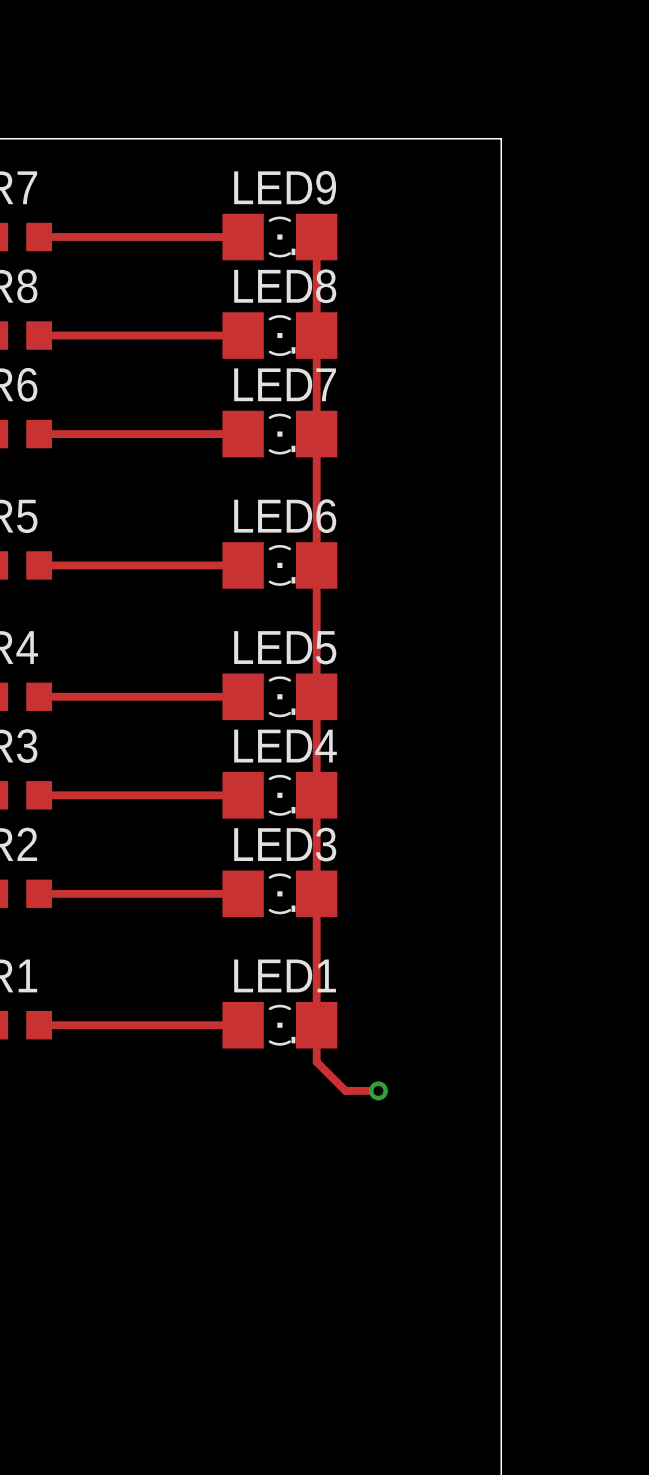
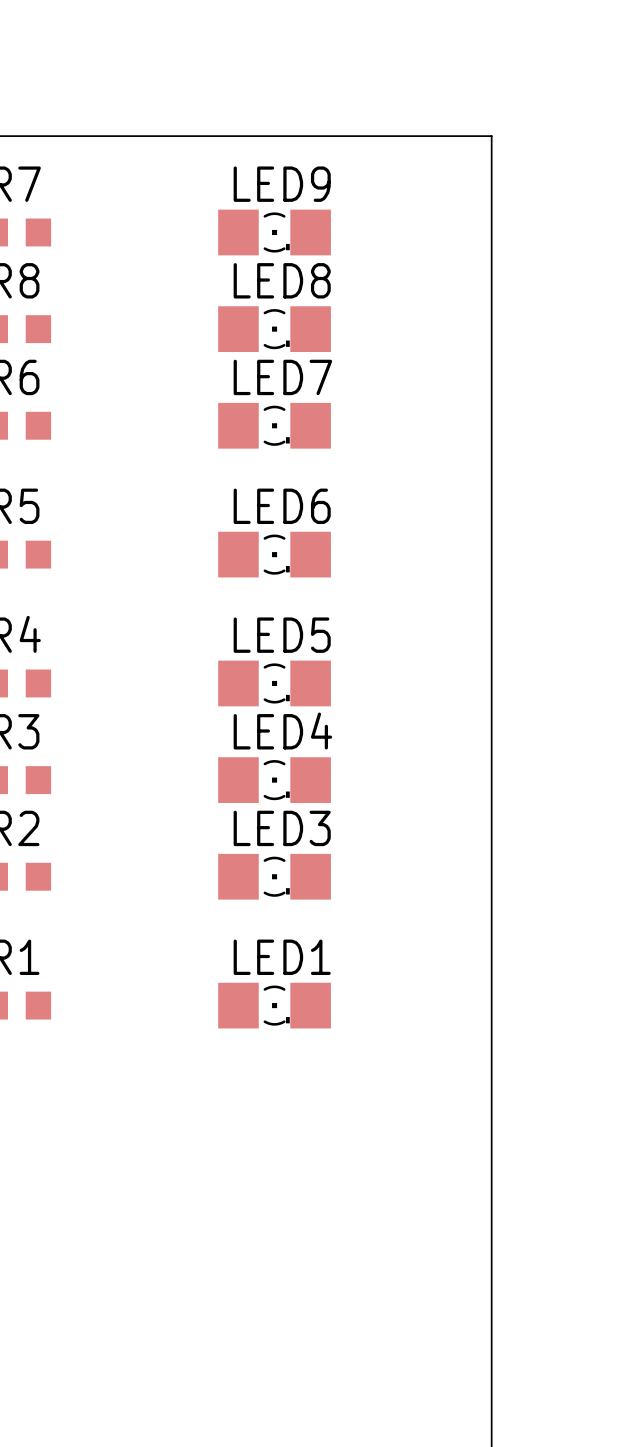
track: (39, 237) (243, 237) -> none
track: (316, 237) (316, 1061) (345, 1090) (378, 1090) -> none
track: (39, 335) (243, 335) -> none
track: (39, 434) (243, 434) -> none
track: (39, 565) (243, 565) -> none
track: (39, 696) (243, 696) -> none
track: (39, 795) (243, 795) -> none
track: (39, 893) (243, 893) -> none
track: (39, 1025) (243, 1025) -> none
via: (378, 1090) -> none

